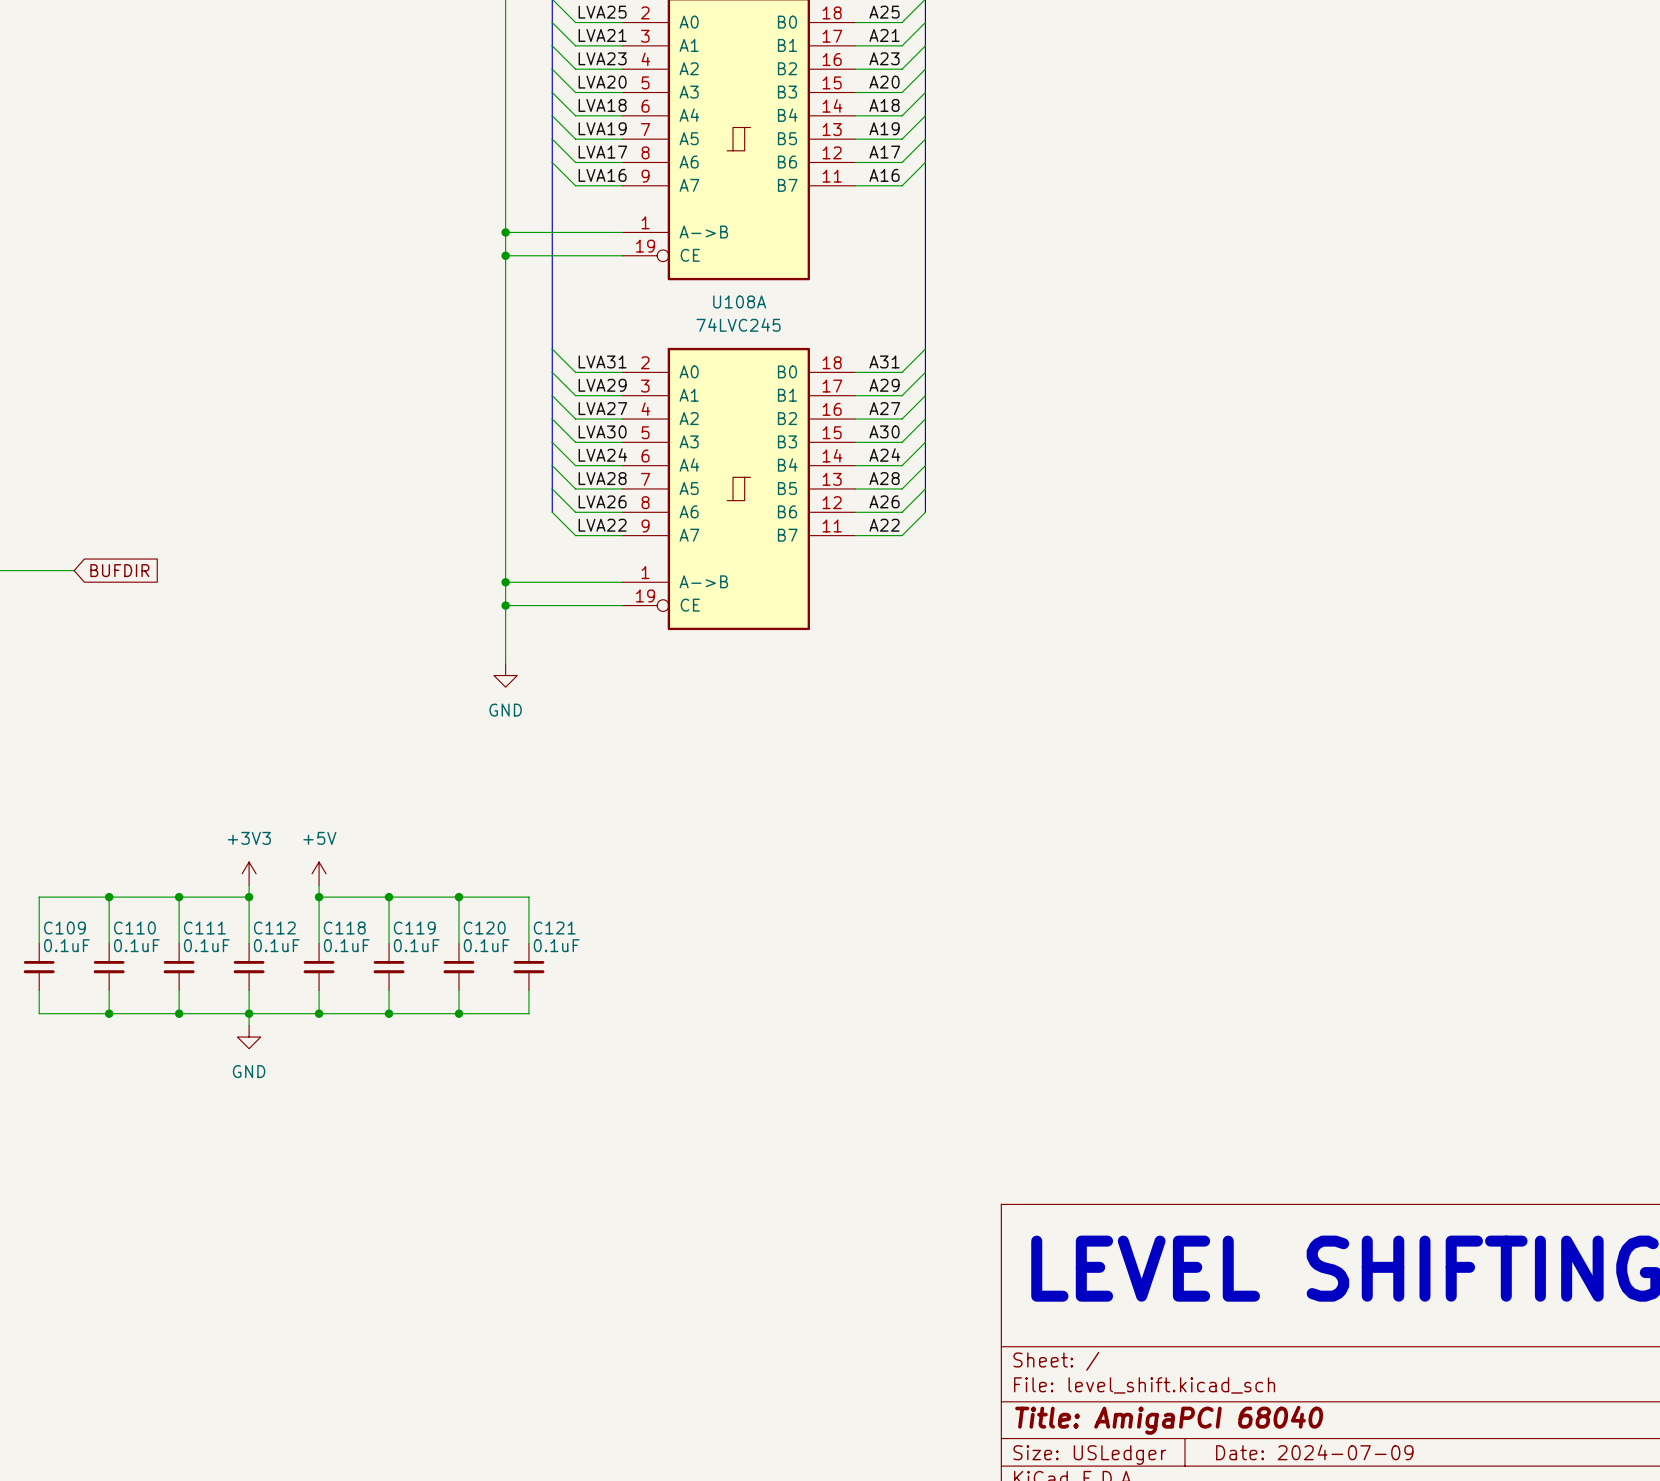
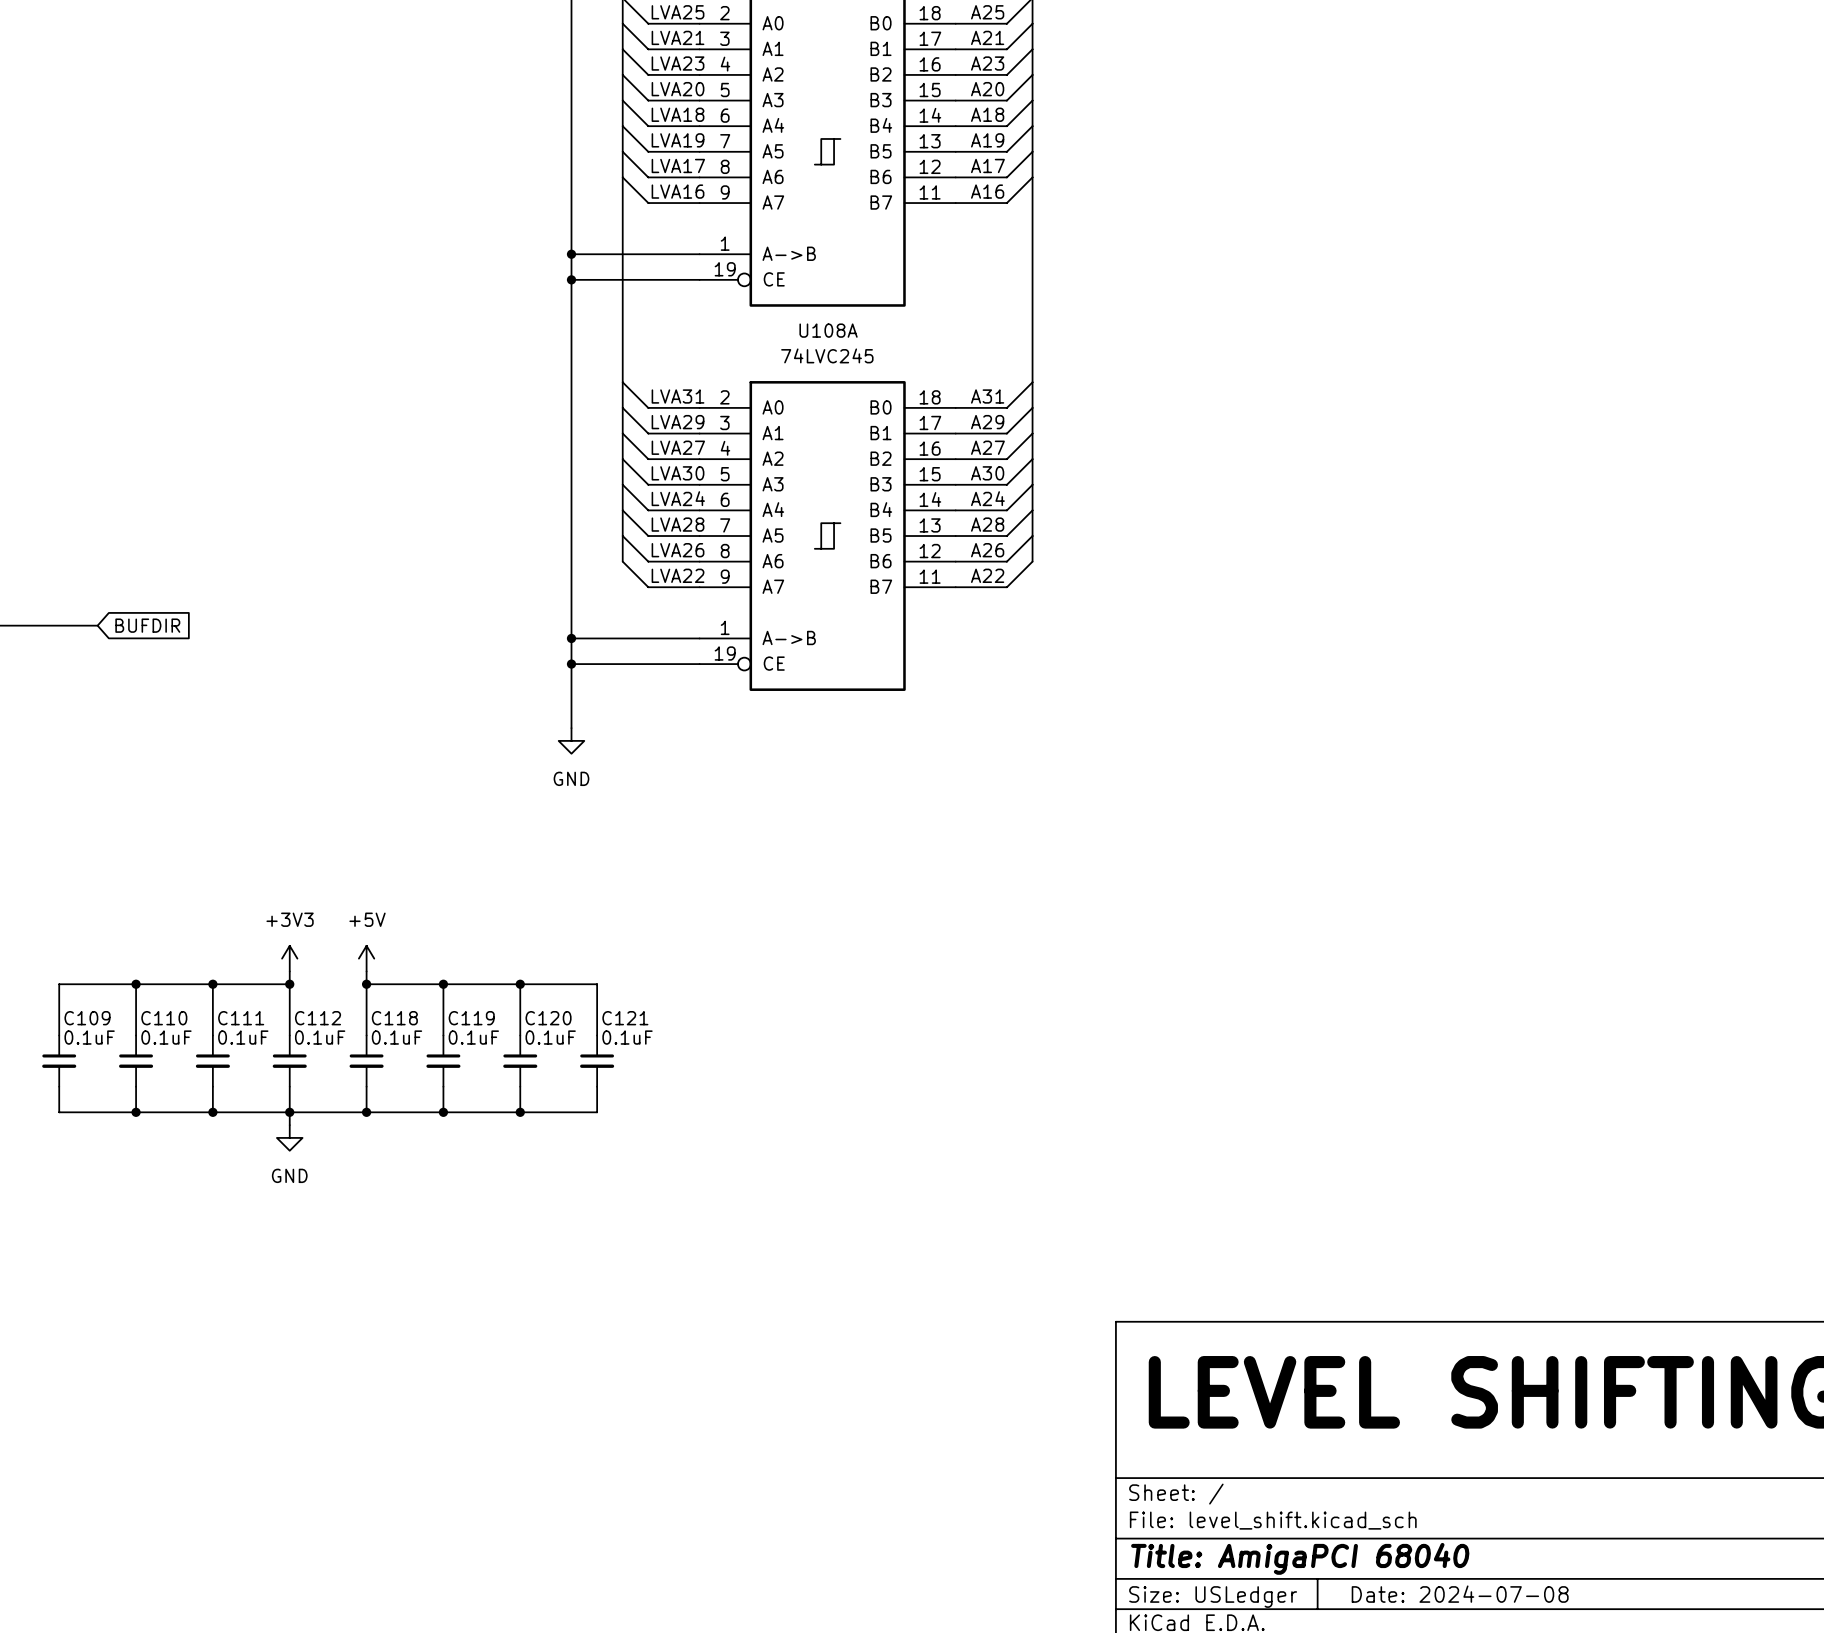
title block: Date: 2024-07-09 (1314, 1452) -> Date: 2024-07-08 (1460, 1594)

